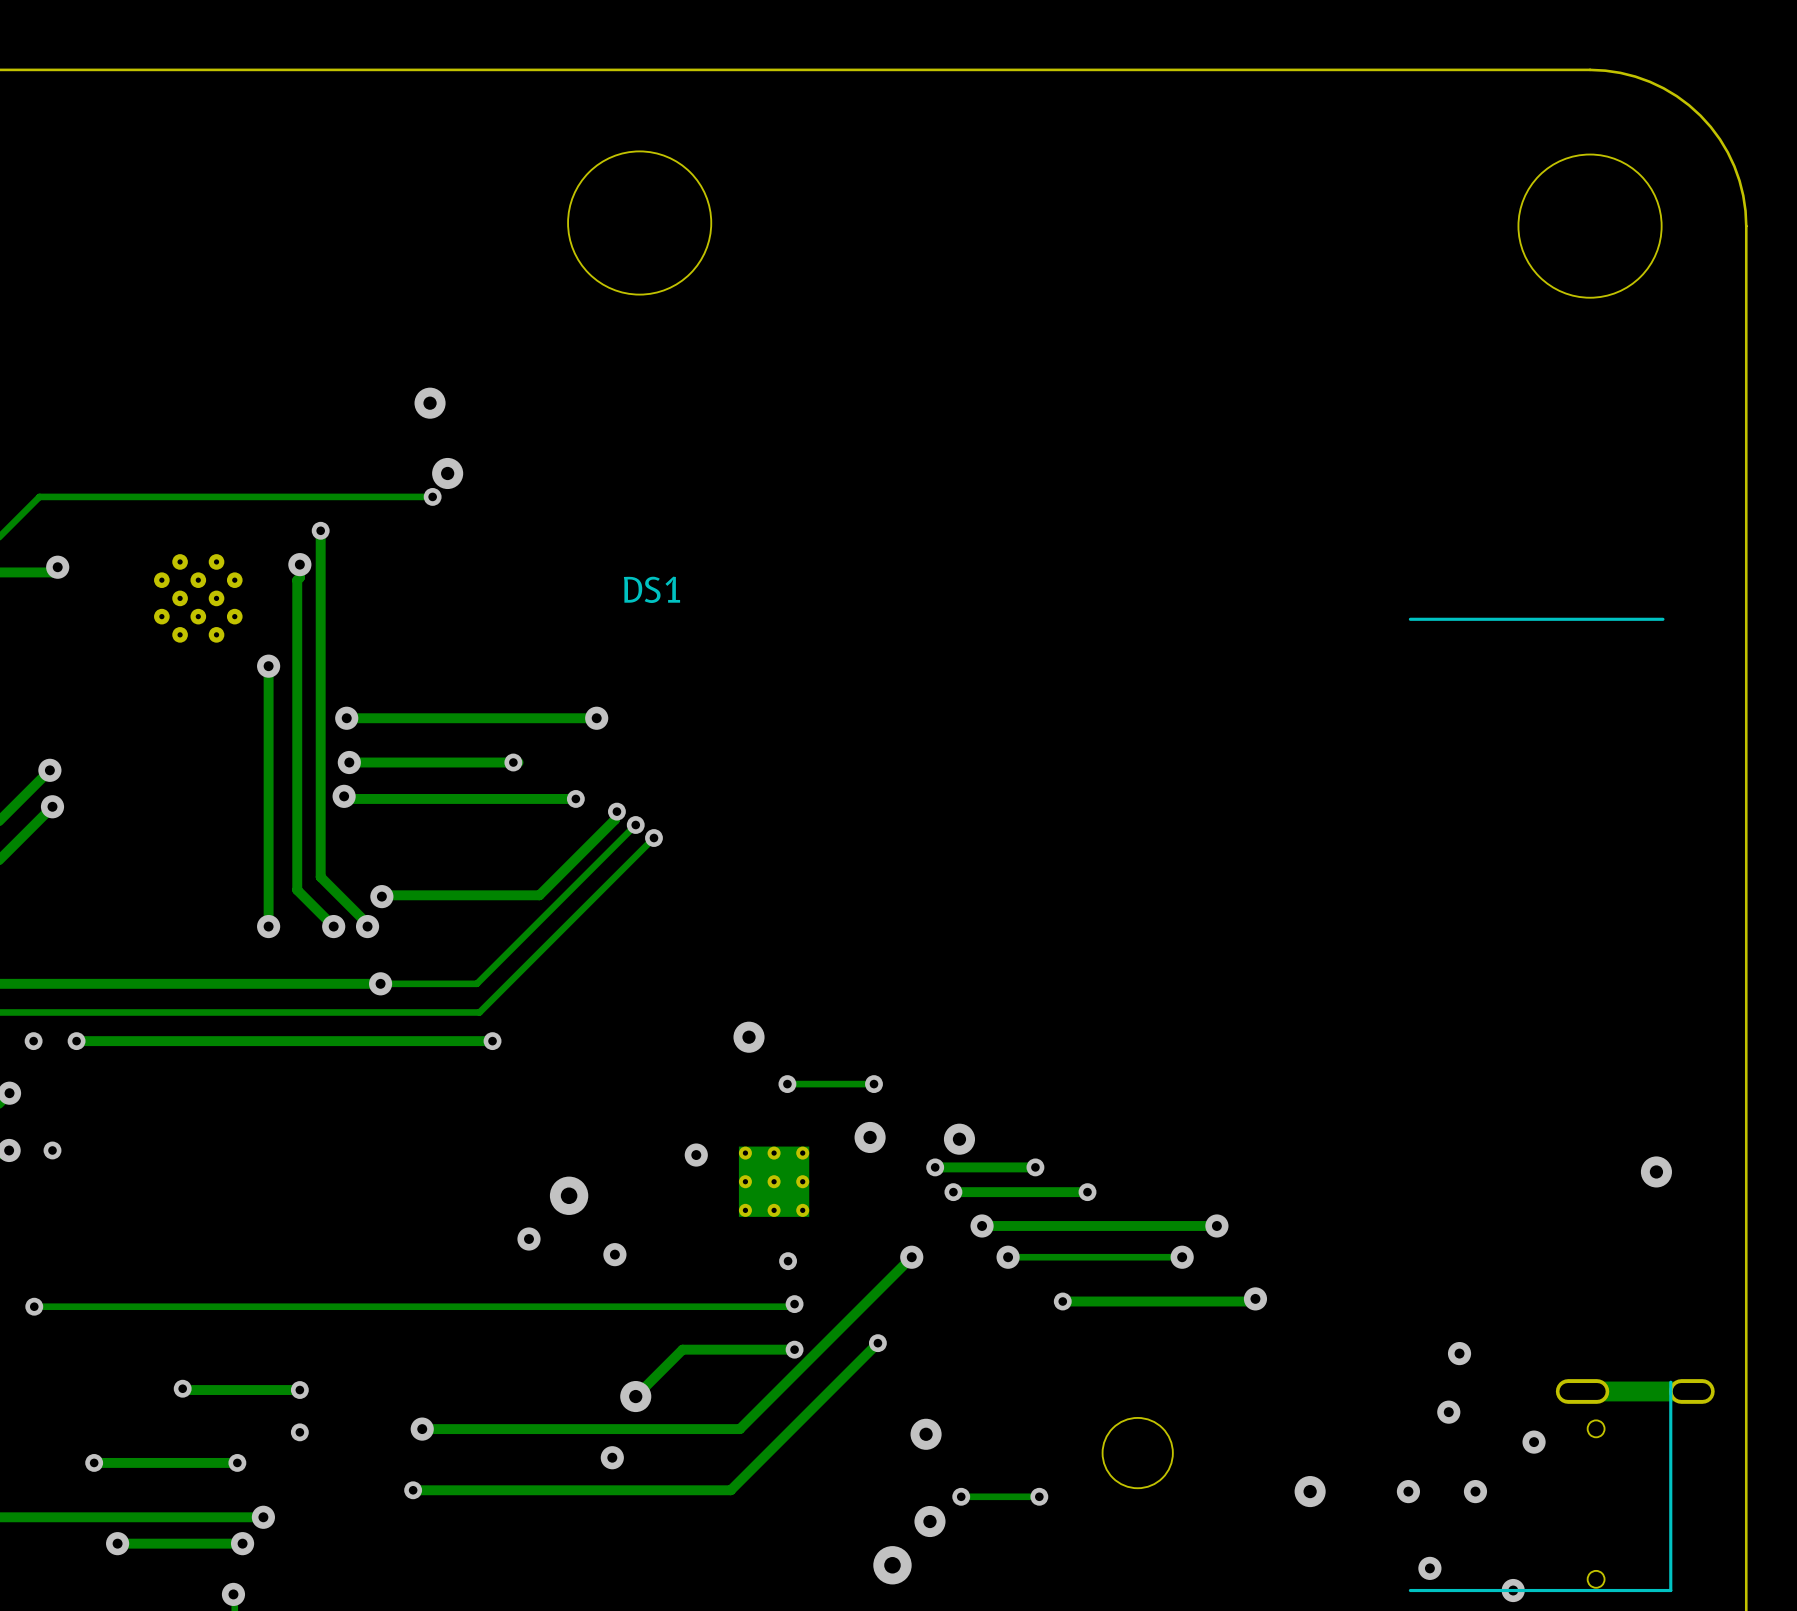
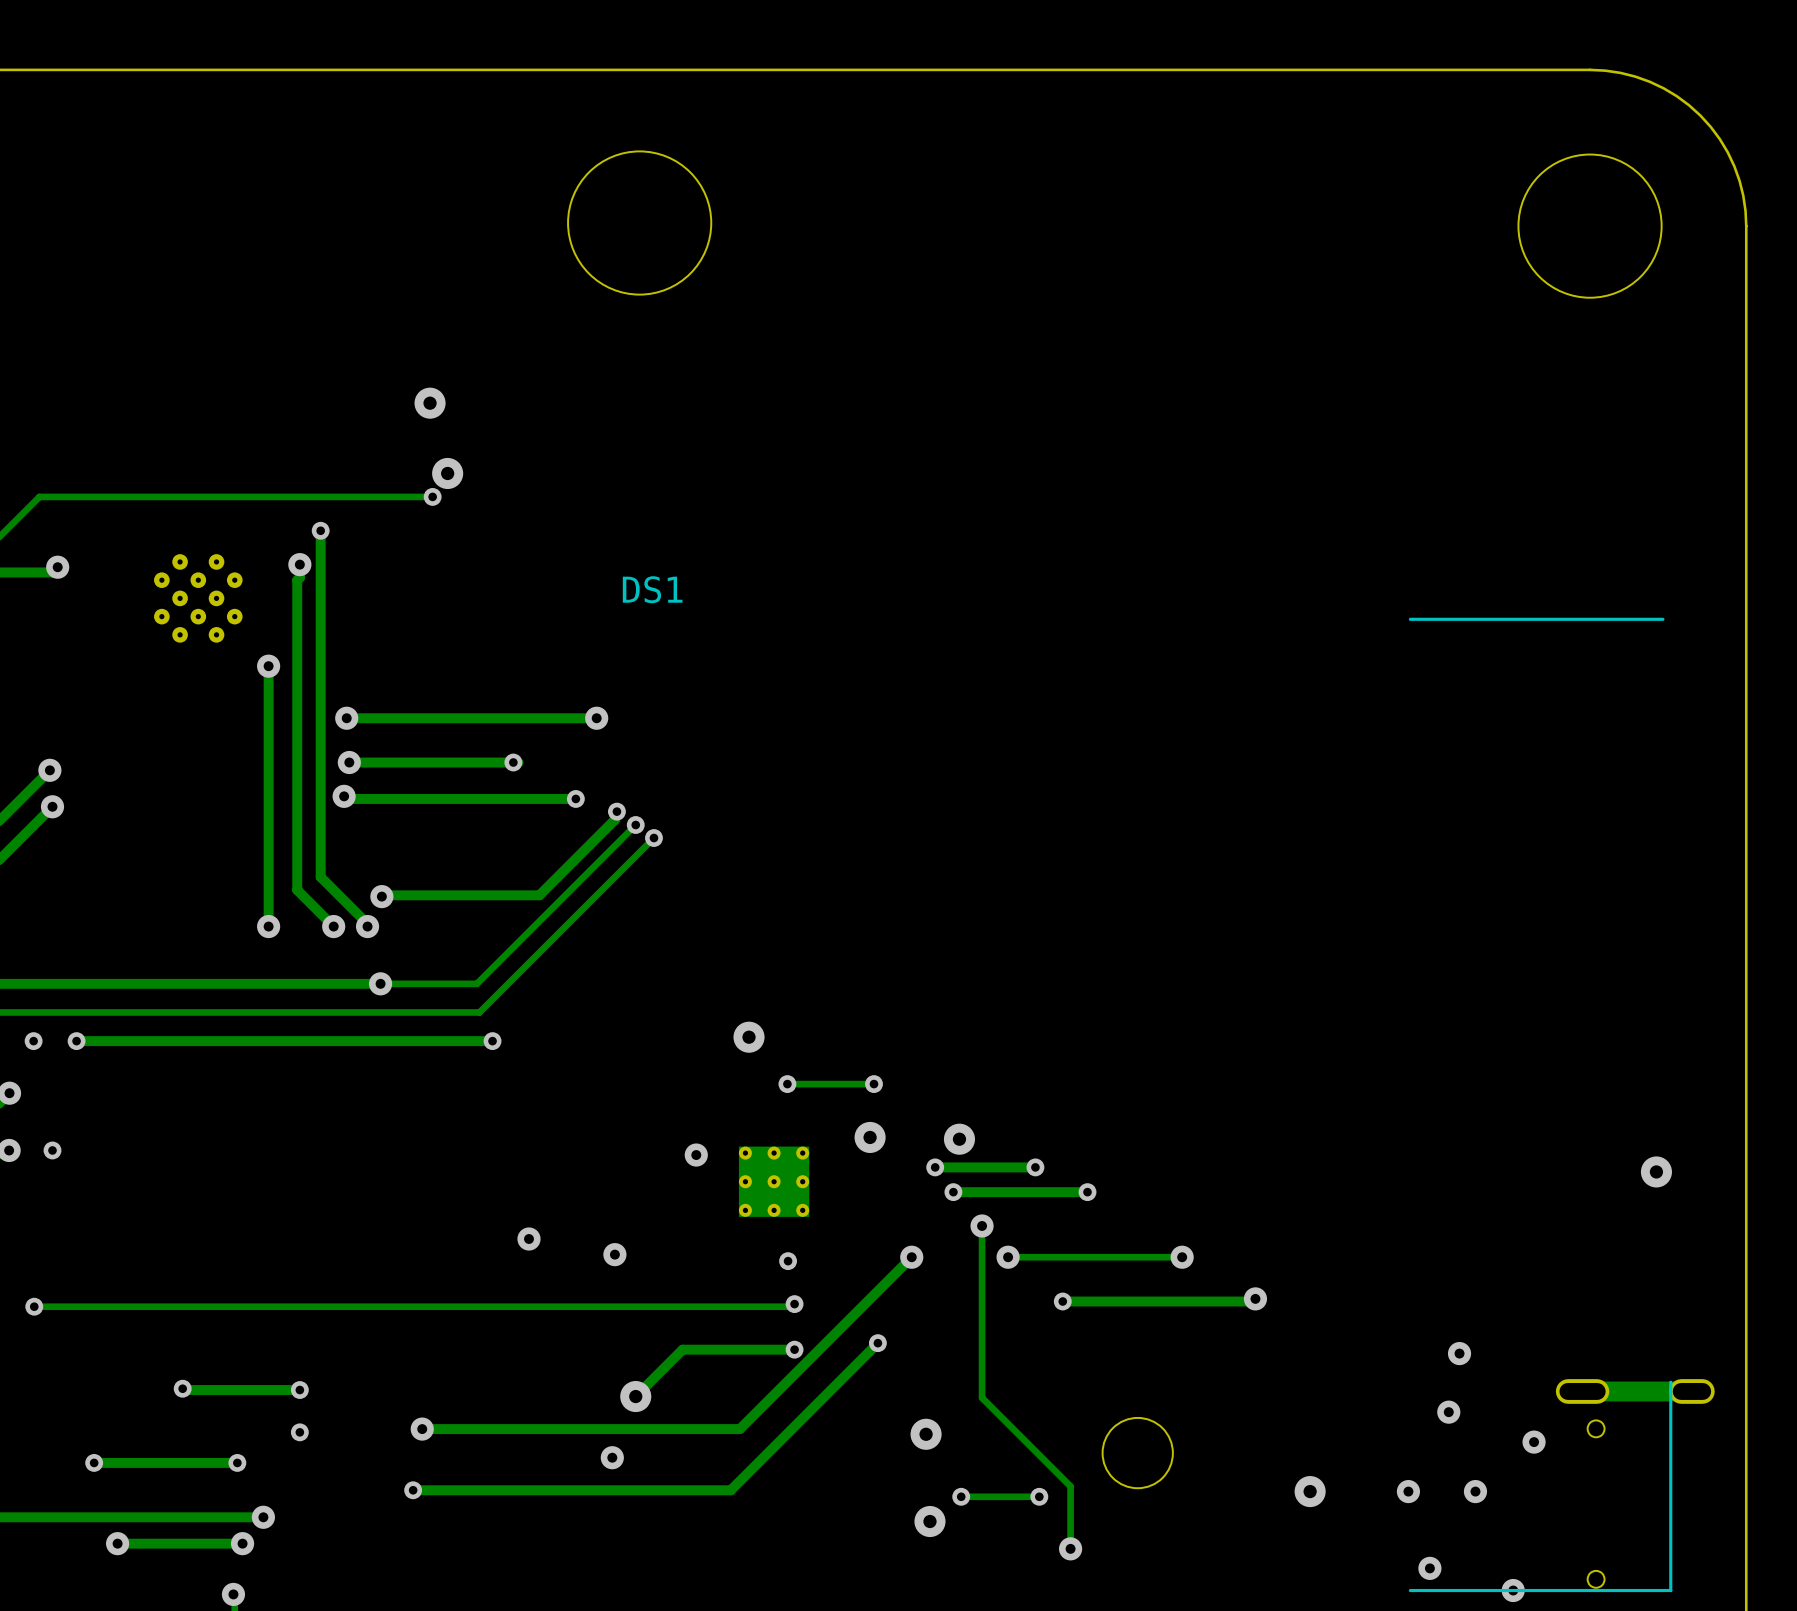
via: (569, 1195) -> none
track: (1216, 1225) (982, 1225) -> (1070, 1548) (1070, 1486) (982, 1397) (982, 1225)
via: (1216, 1225) -> none
via: none -> (1070, 1548)
via: (892, 1565) -> none

